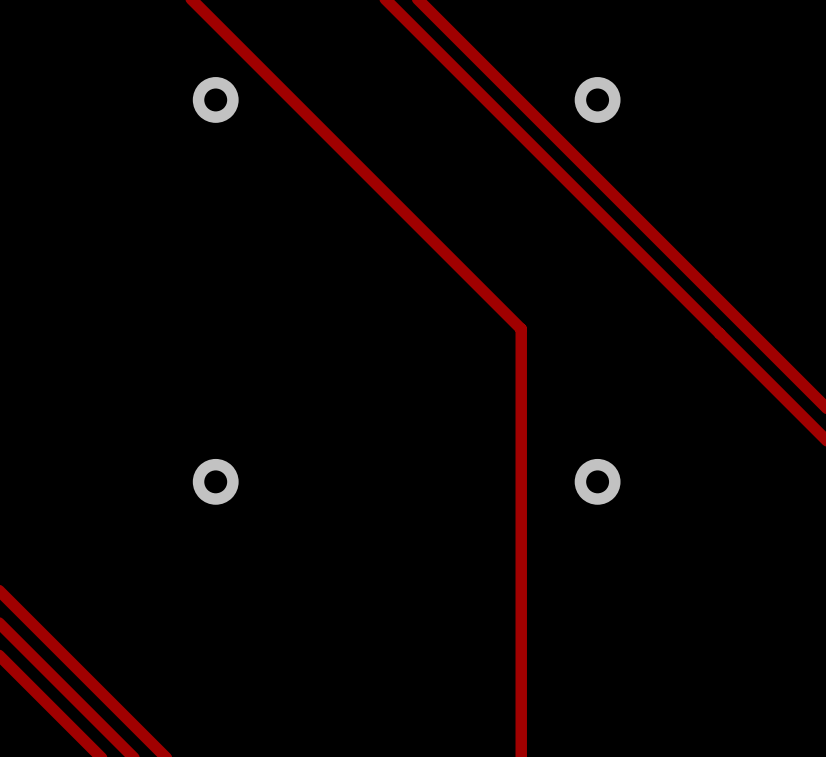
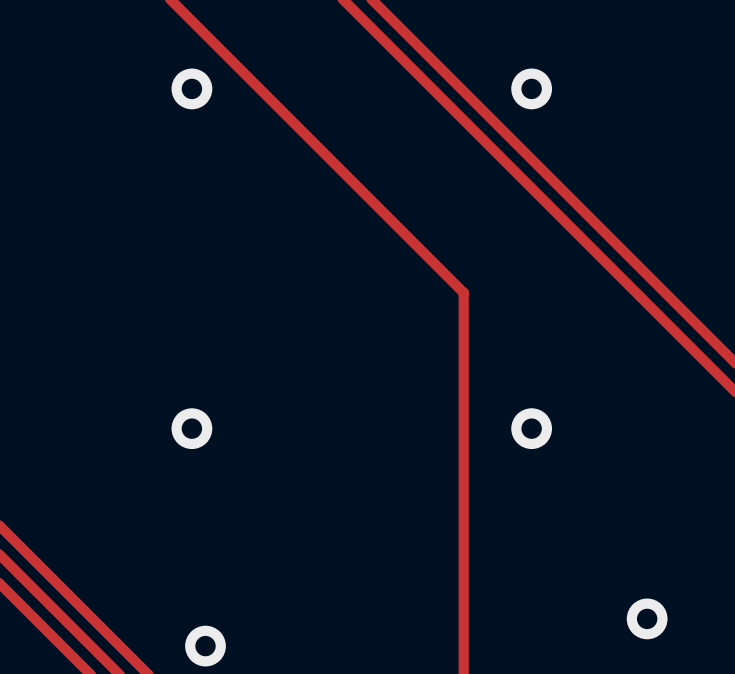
via: none -> (647, 618)
via: none -> (205, 646)

